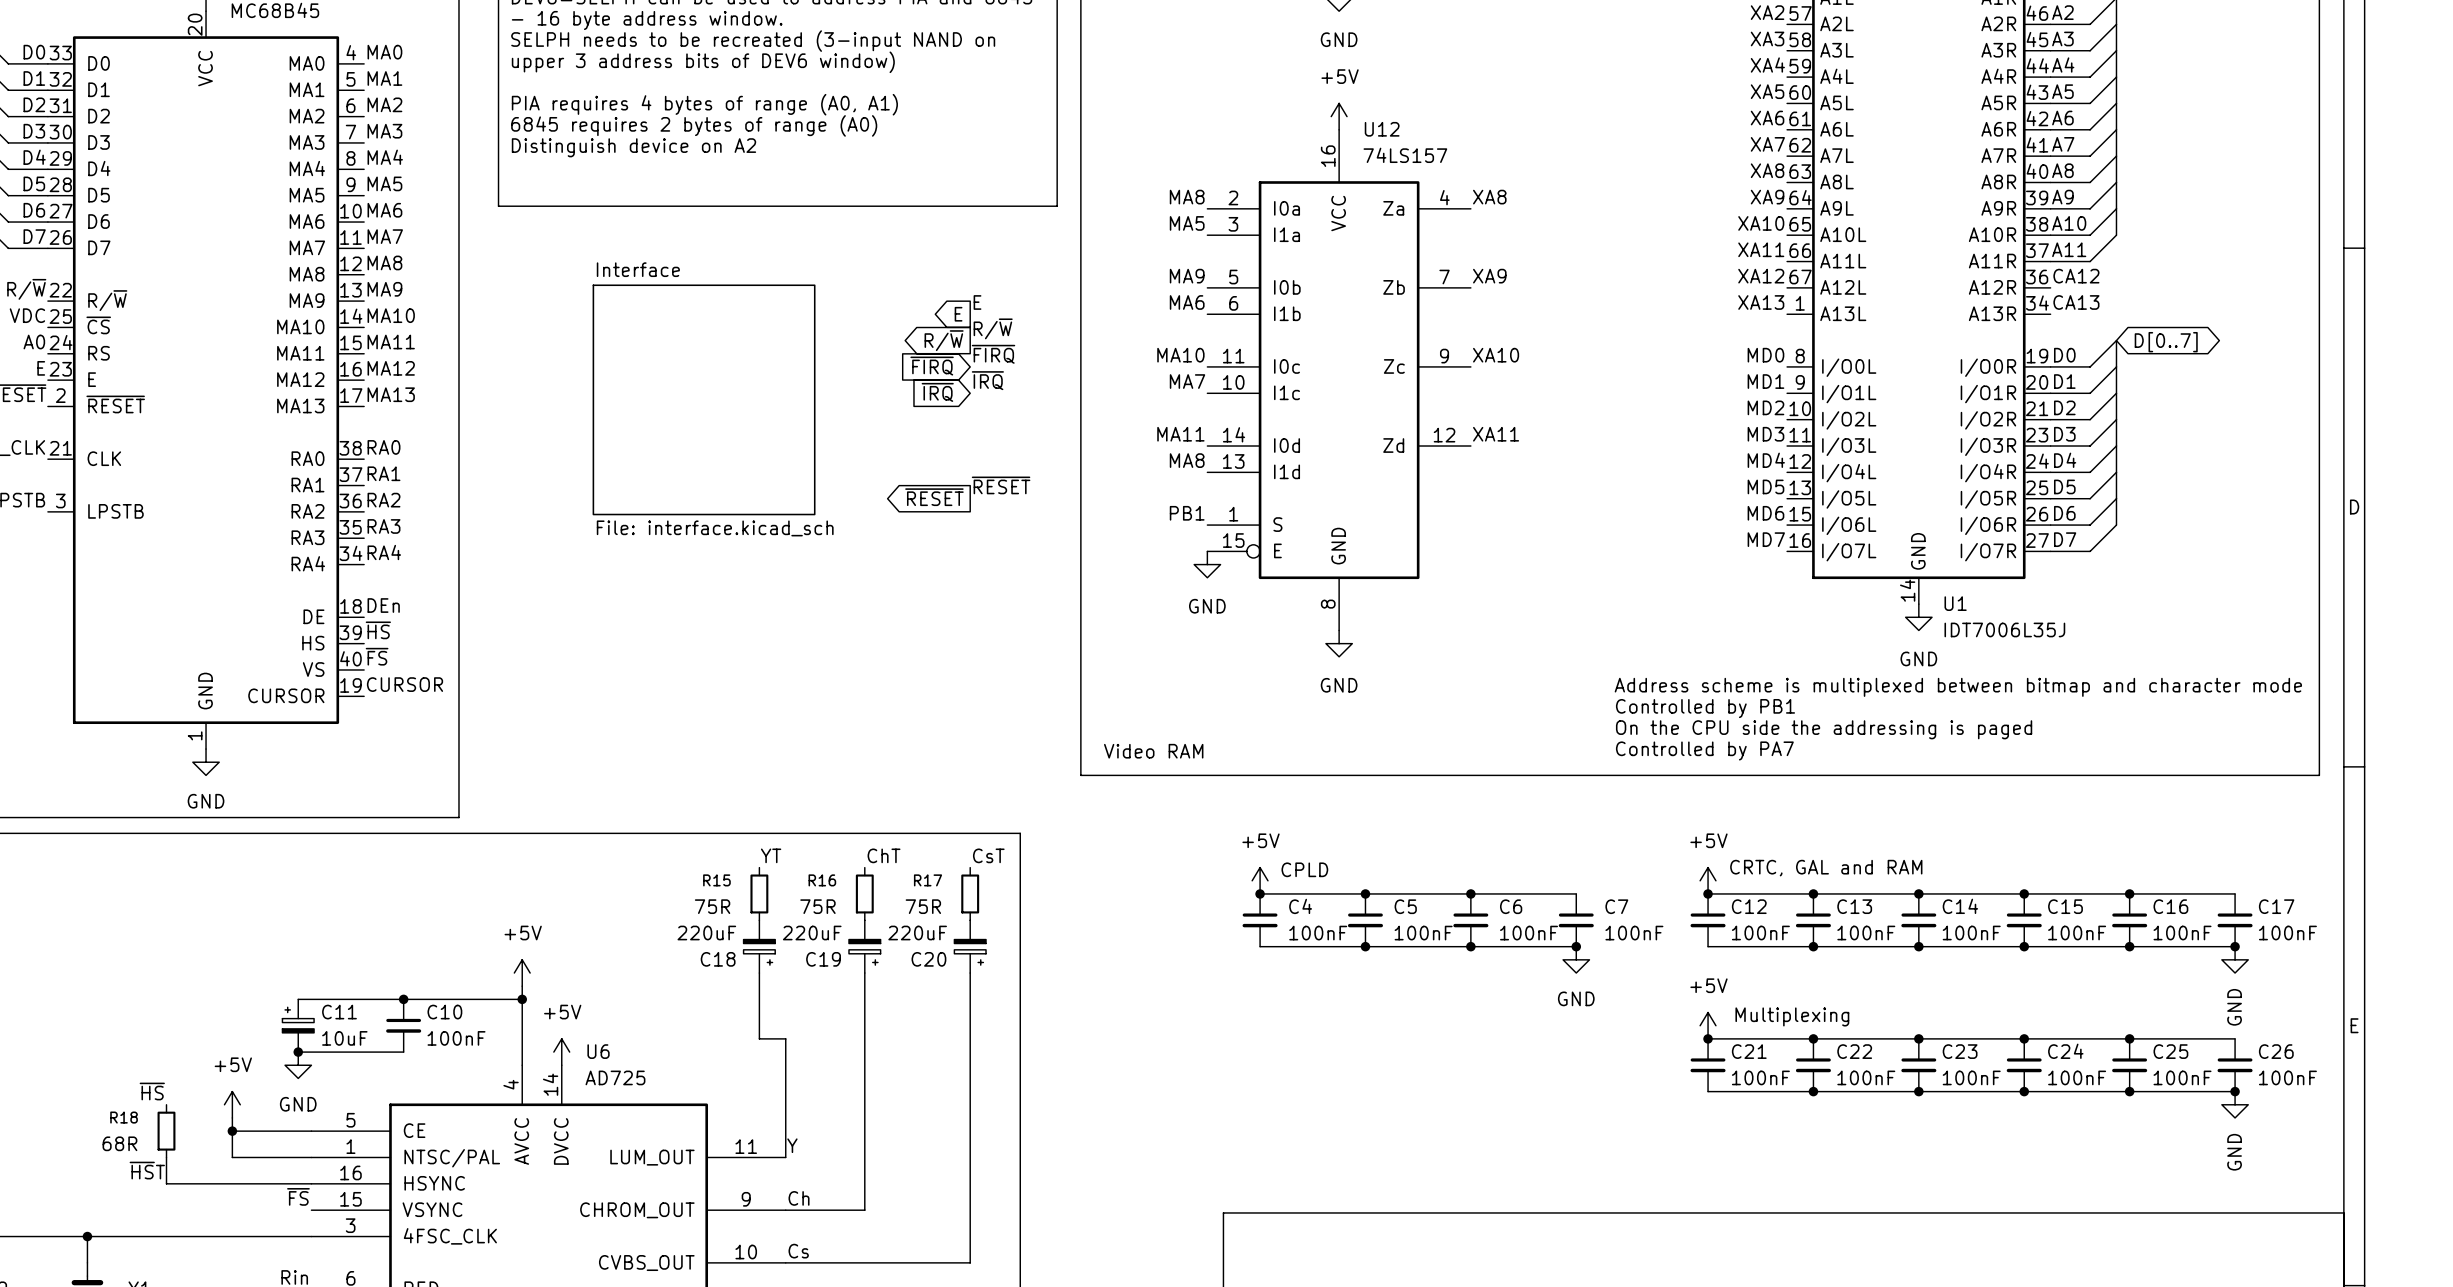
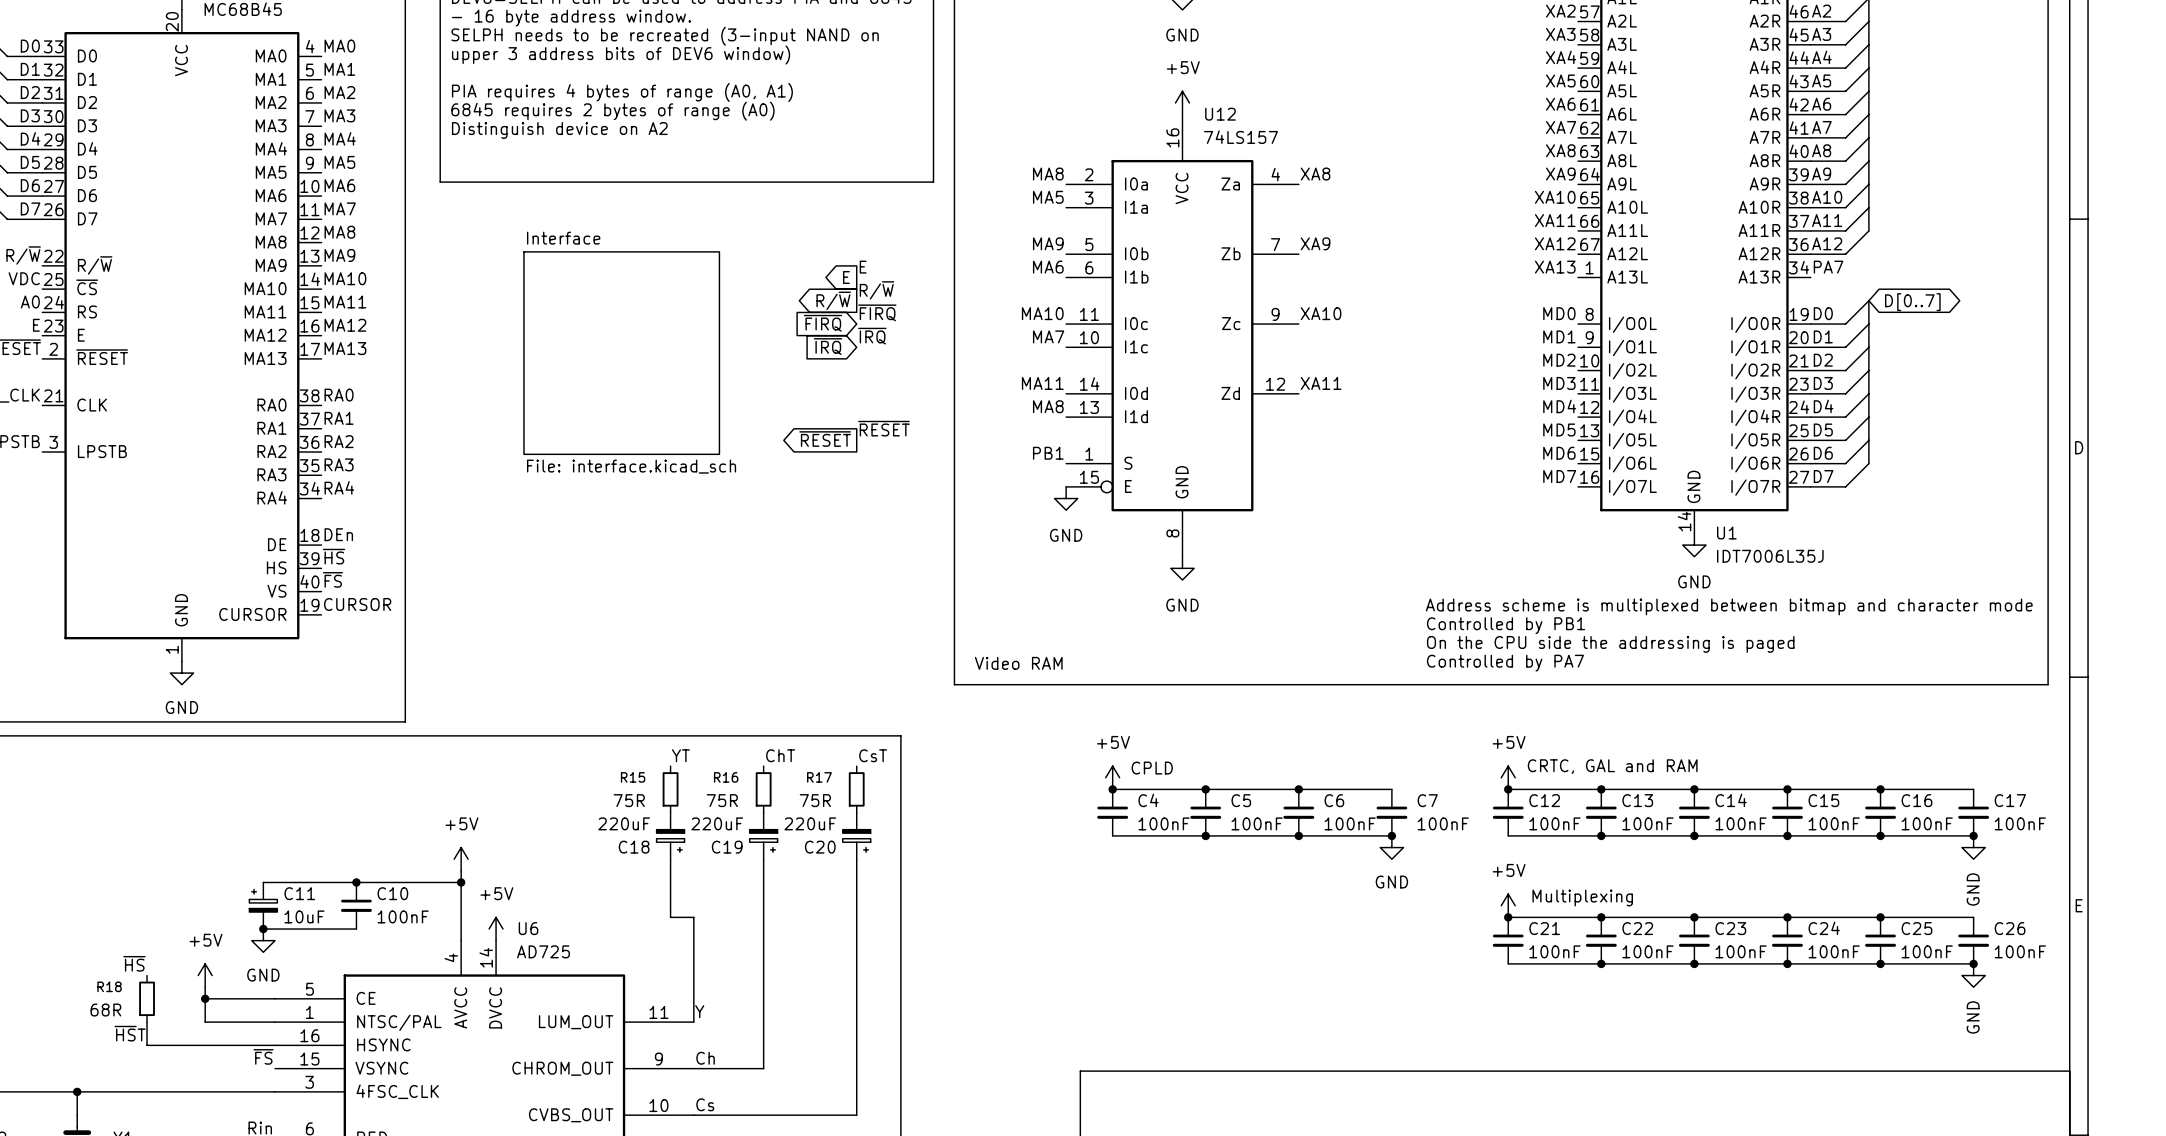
bus: none -> (1868, 207) (1868, 230)
wire: none -> (1868, 230) (1845, 254) (1810, 254)
label: CA12 (2076, 276) -> A12 (1827, 243)
label: CA13 (2076, 302) -> PA7 (1828, 267)

